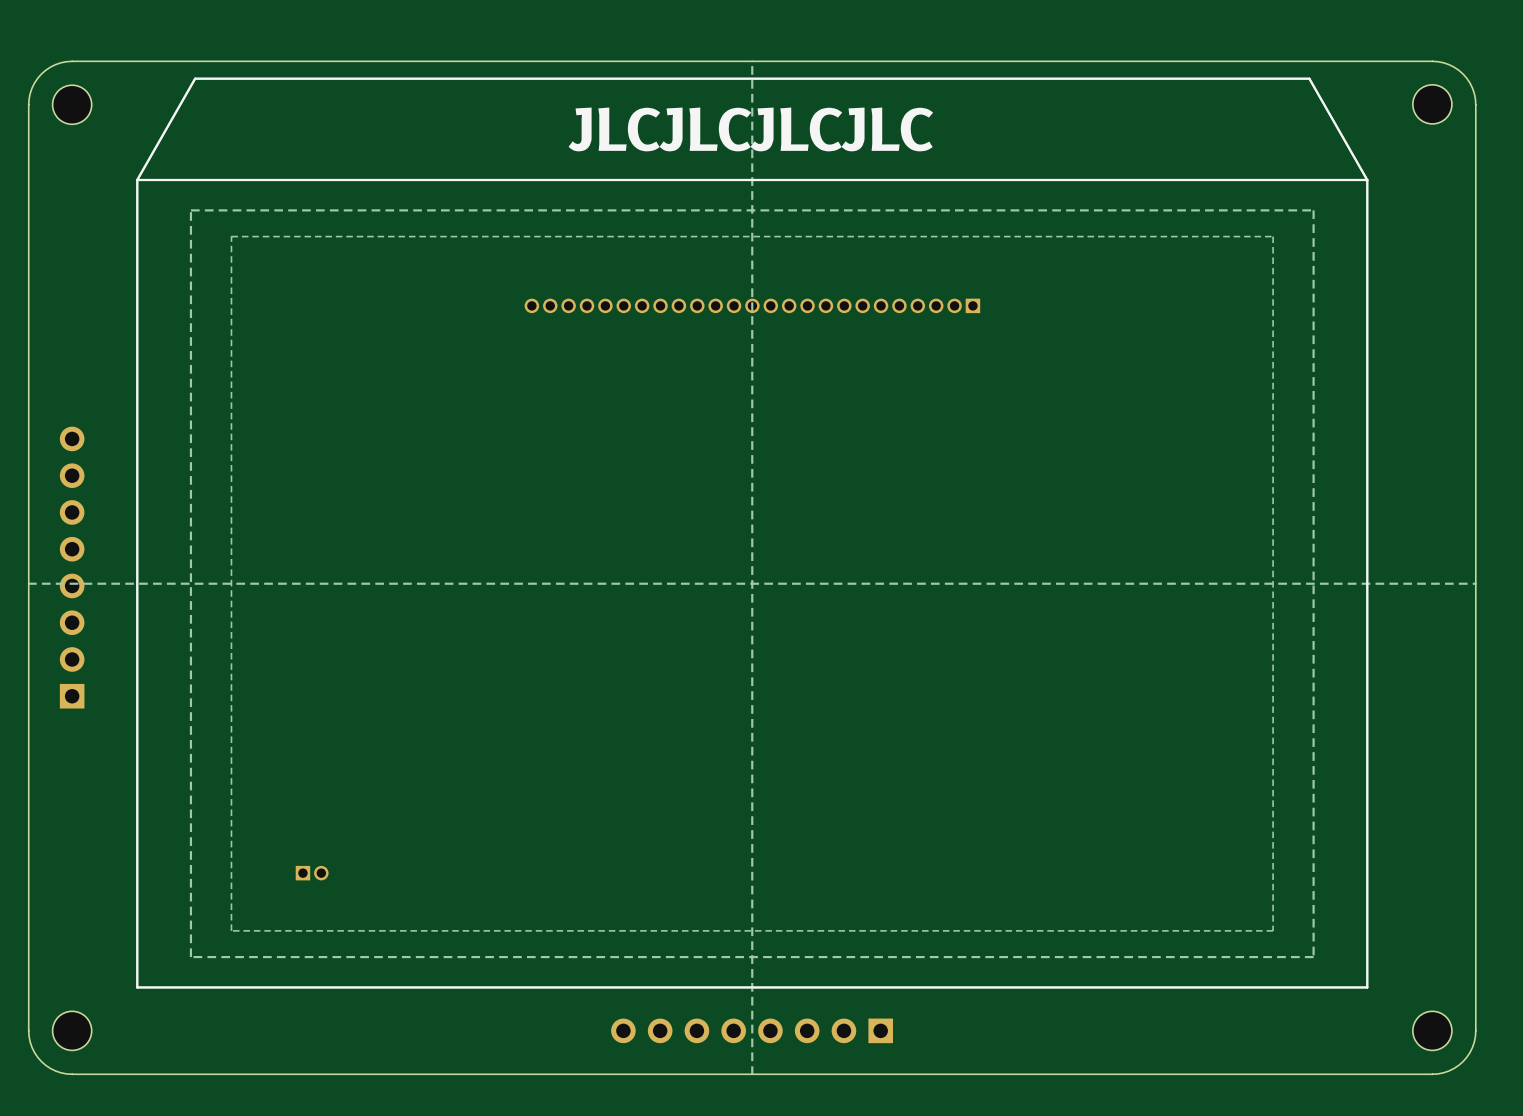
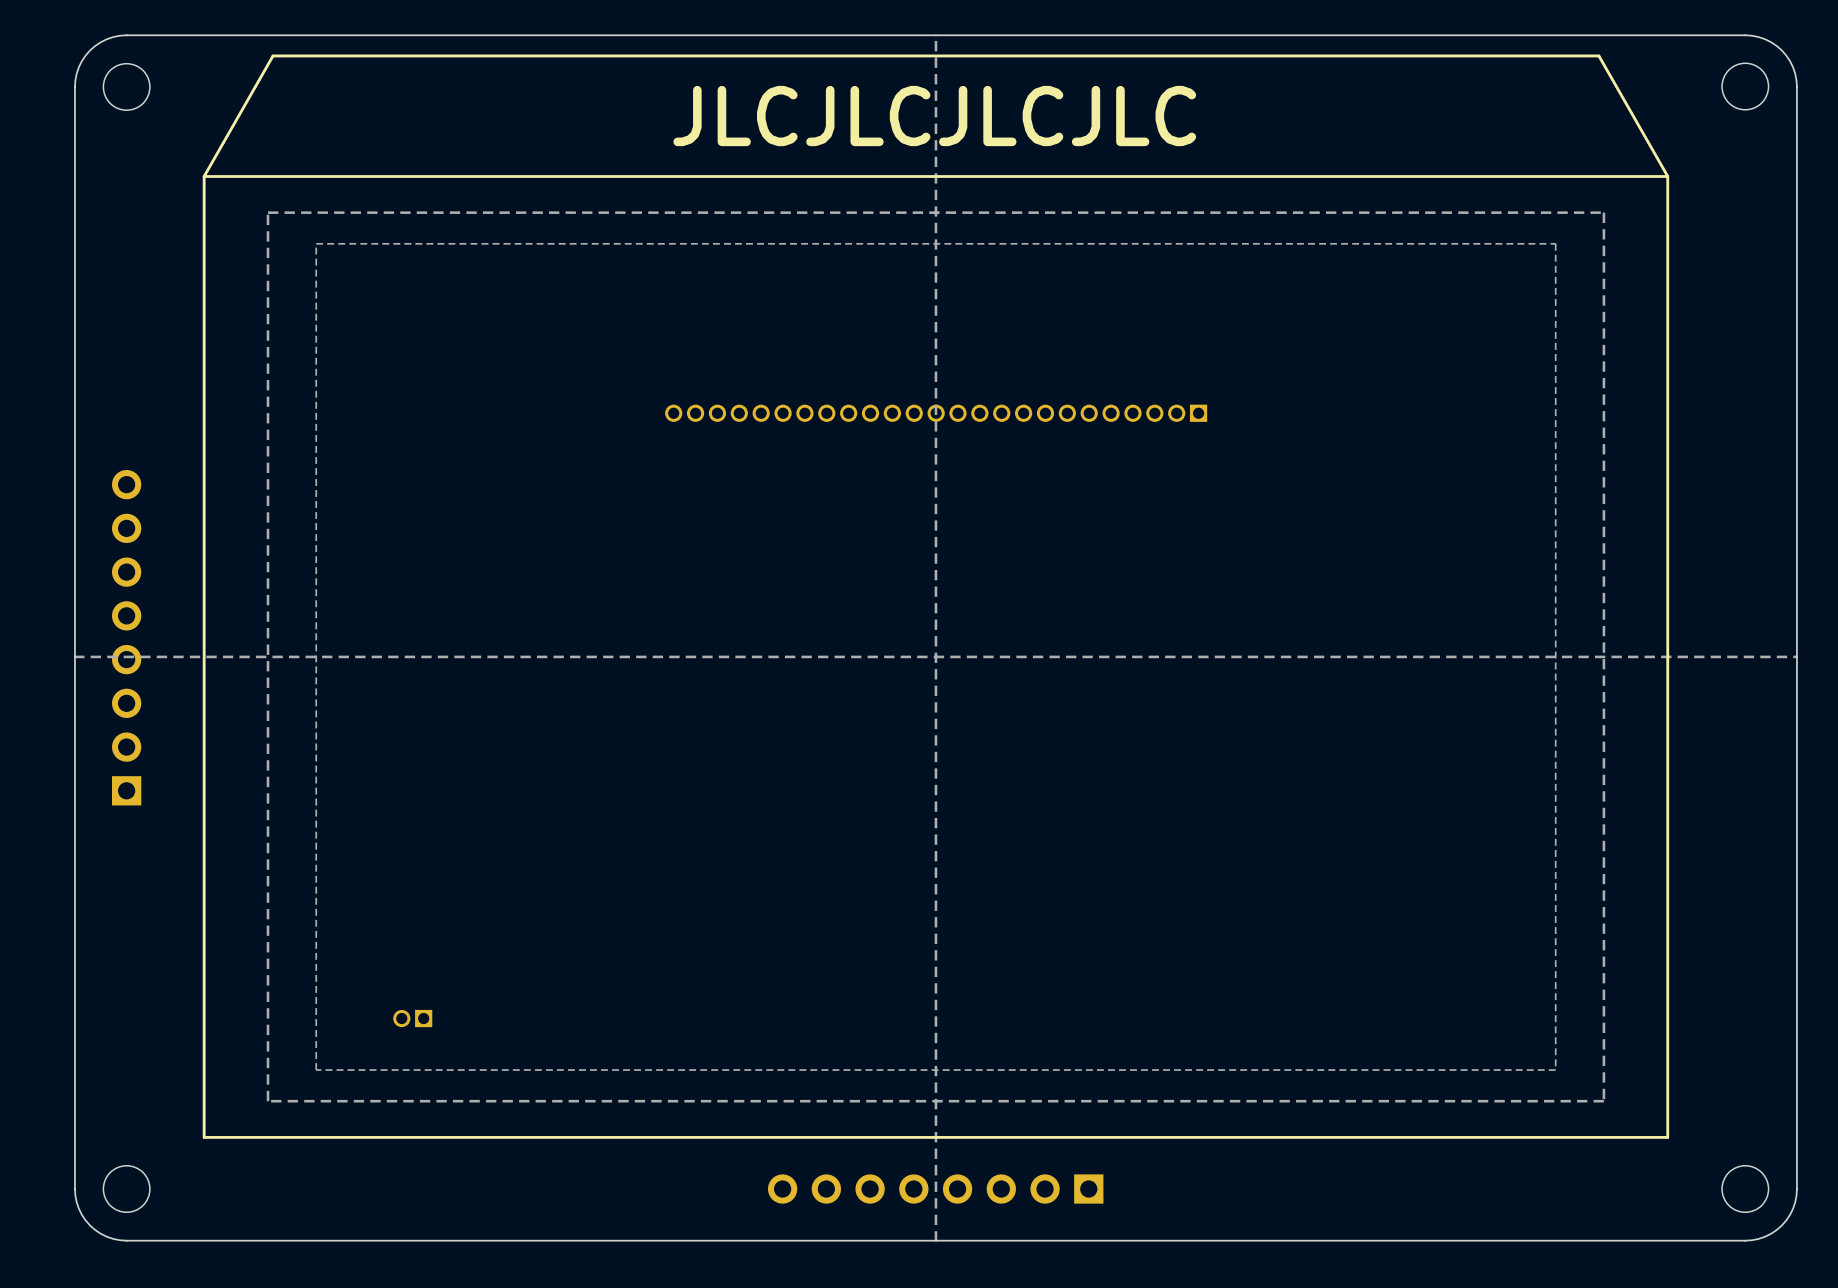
part position: (752, 305) -> (936, 413)
part rotation: 0° (312, 873) -> 180° (412, 1018)

